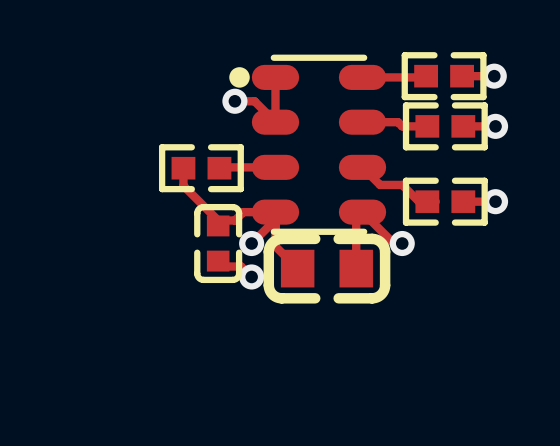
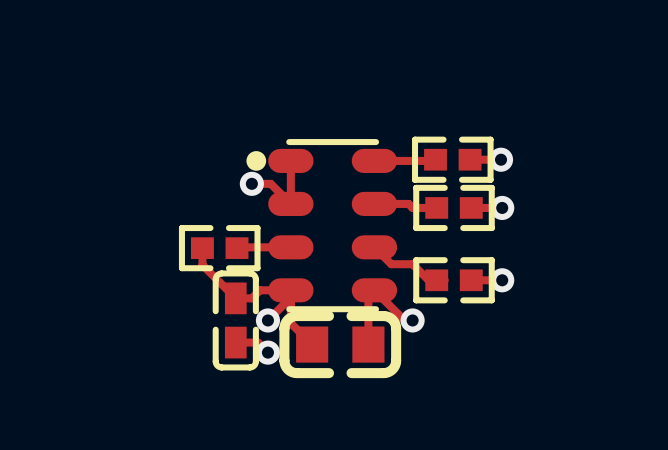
part footprint: [194, 203, 243, 284] -> [212, 270, 259, 371]

